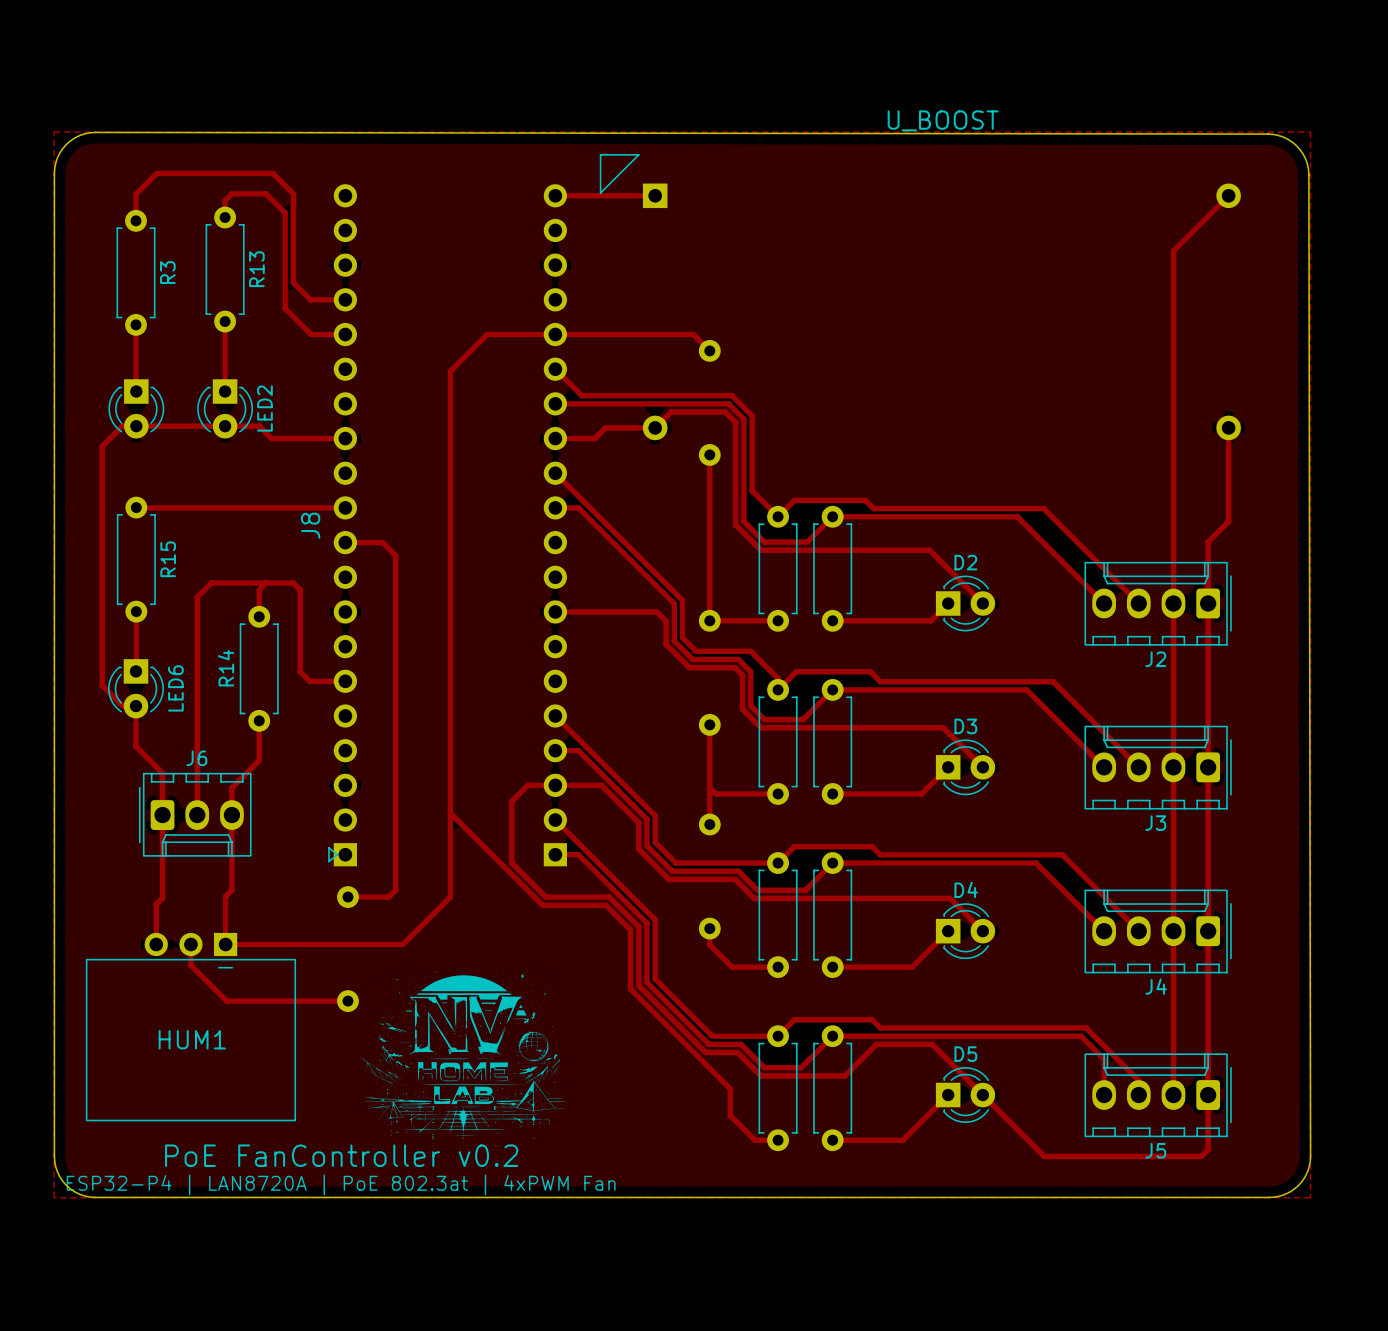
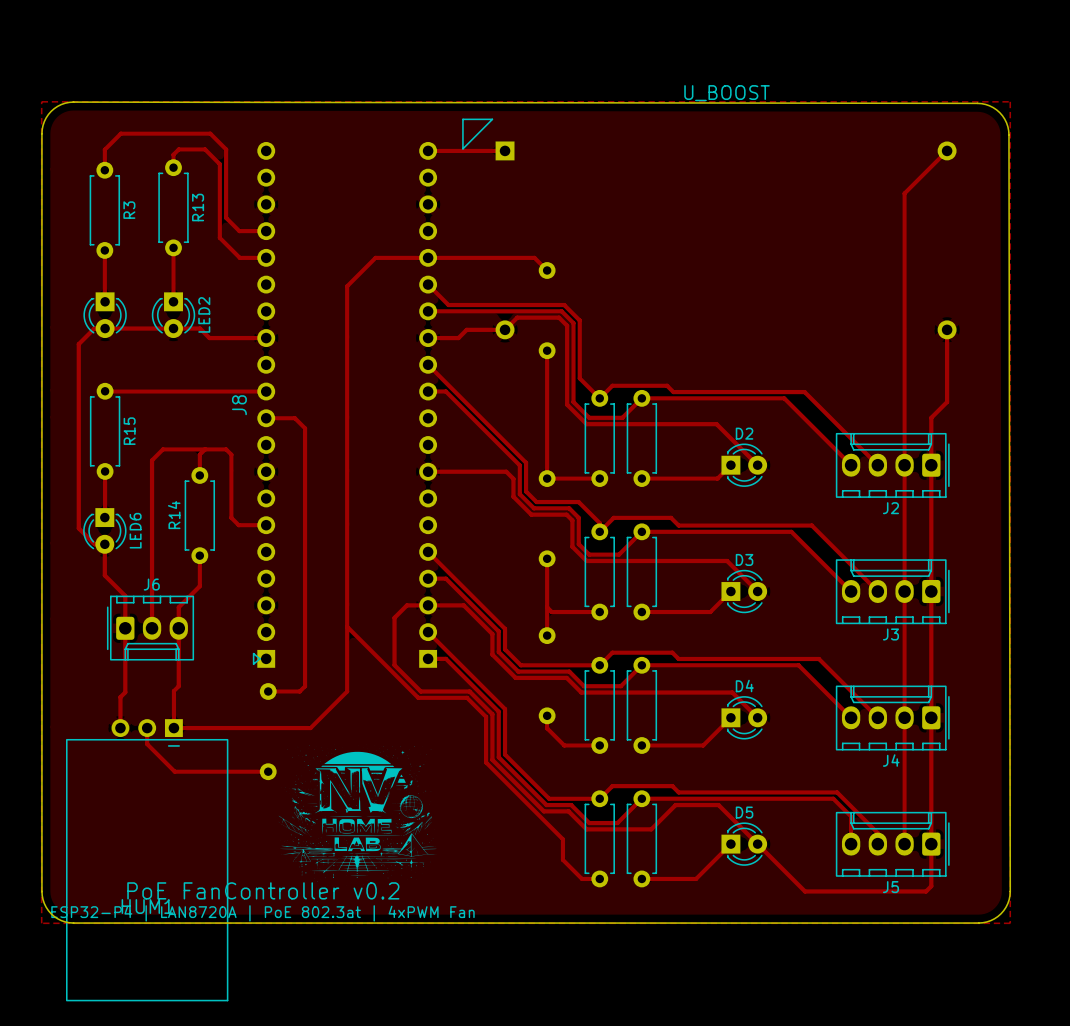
HUM1 footprint: [85, 932, 297, 1122] -> [66, 719, 229, 1002]
HUM1 name position: HUM1 (192, 1039) -> HUM1 (147, 906)

